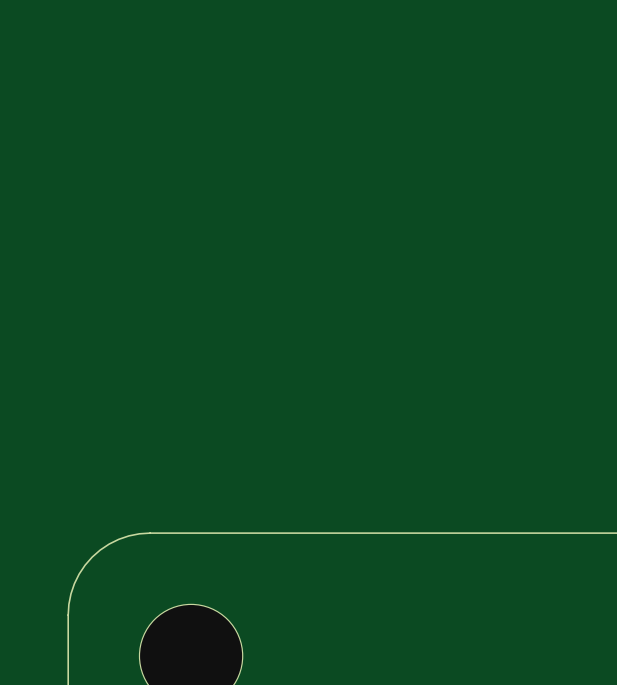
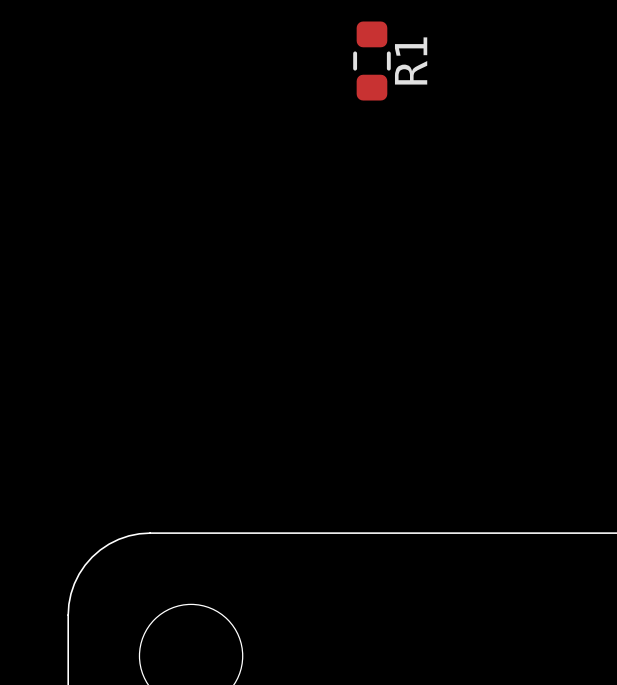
R1: none -> (371, 61)

